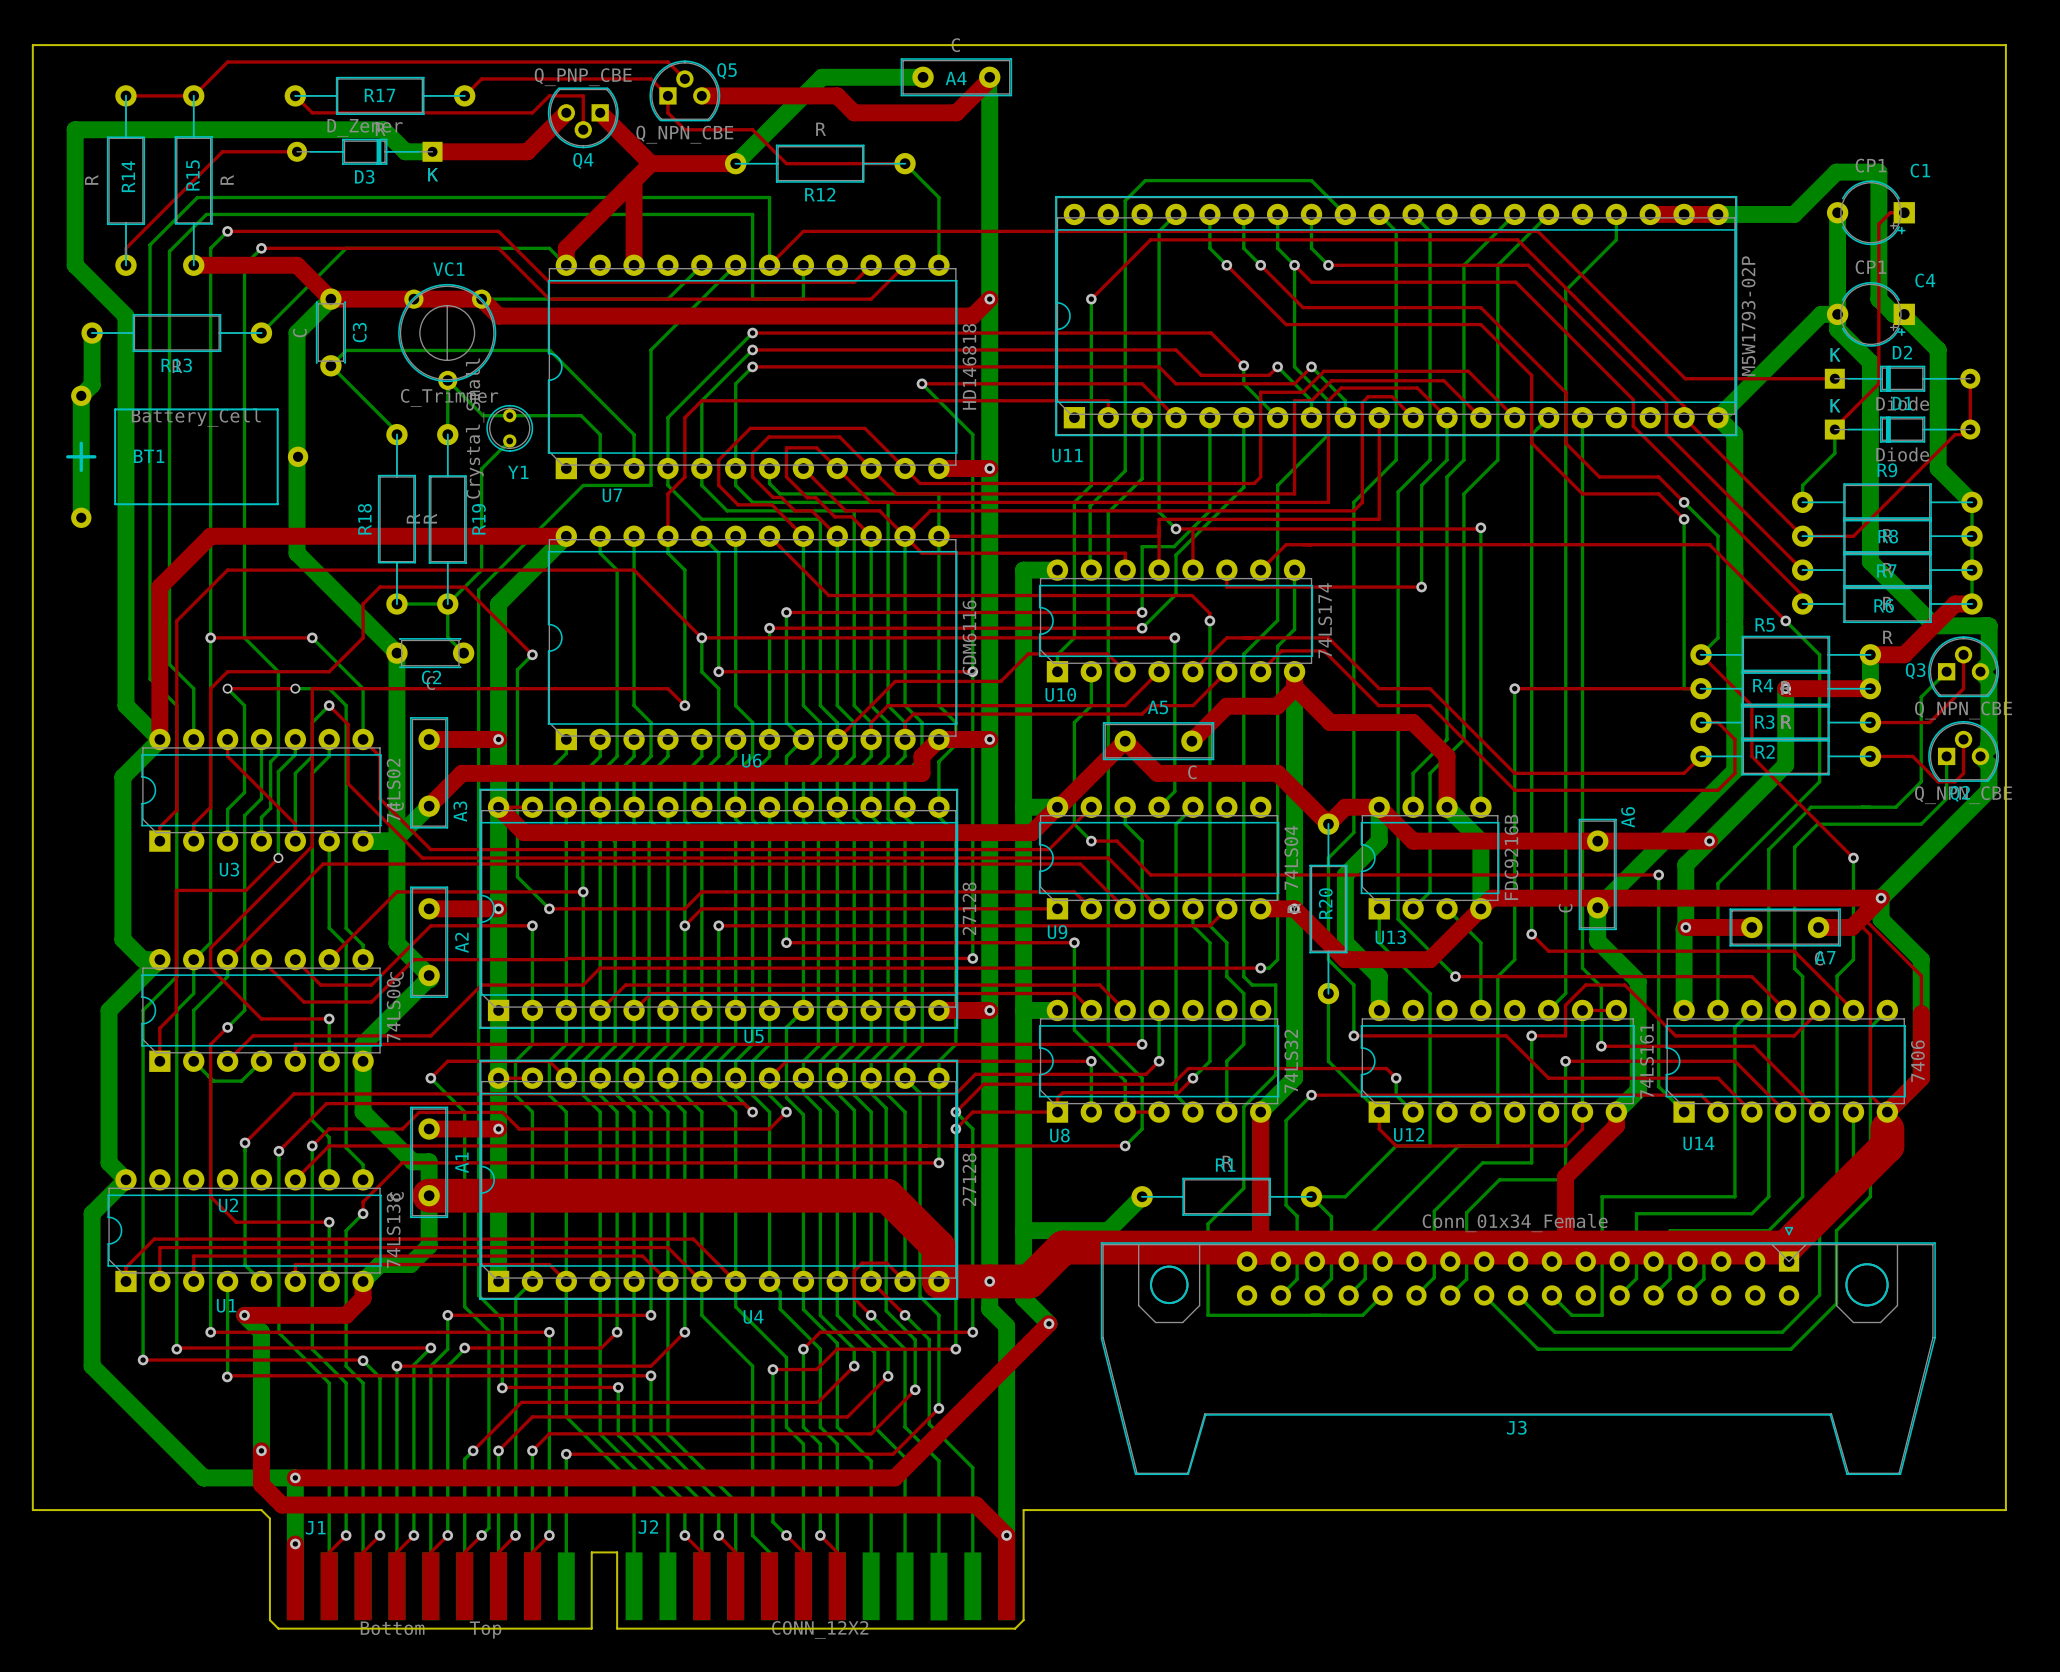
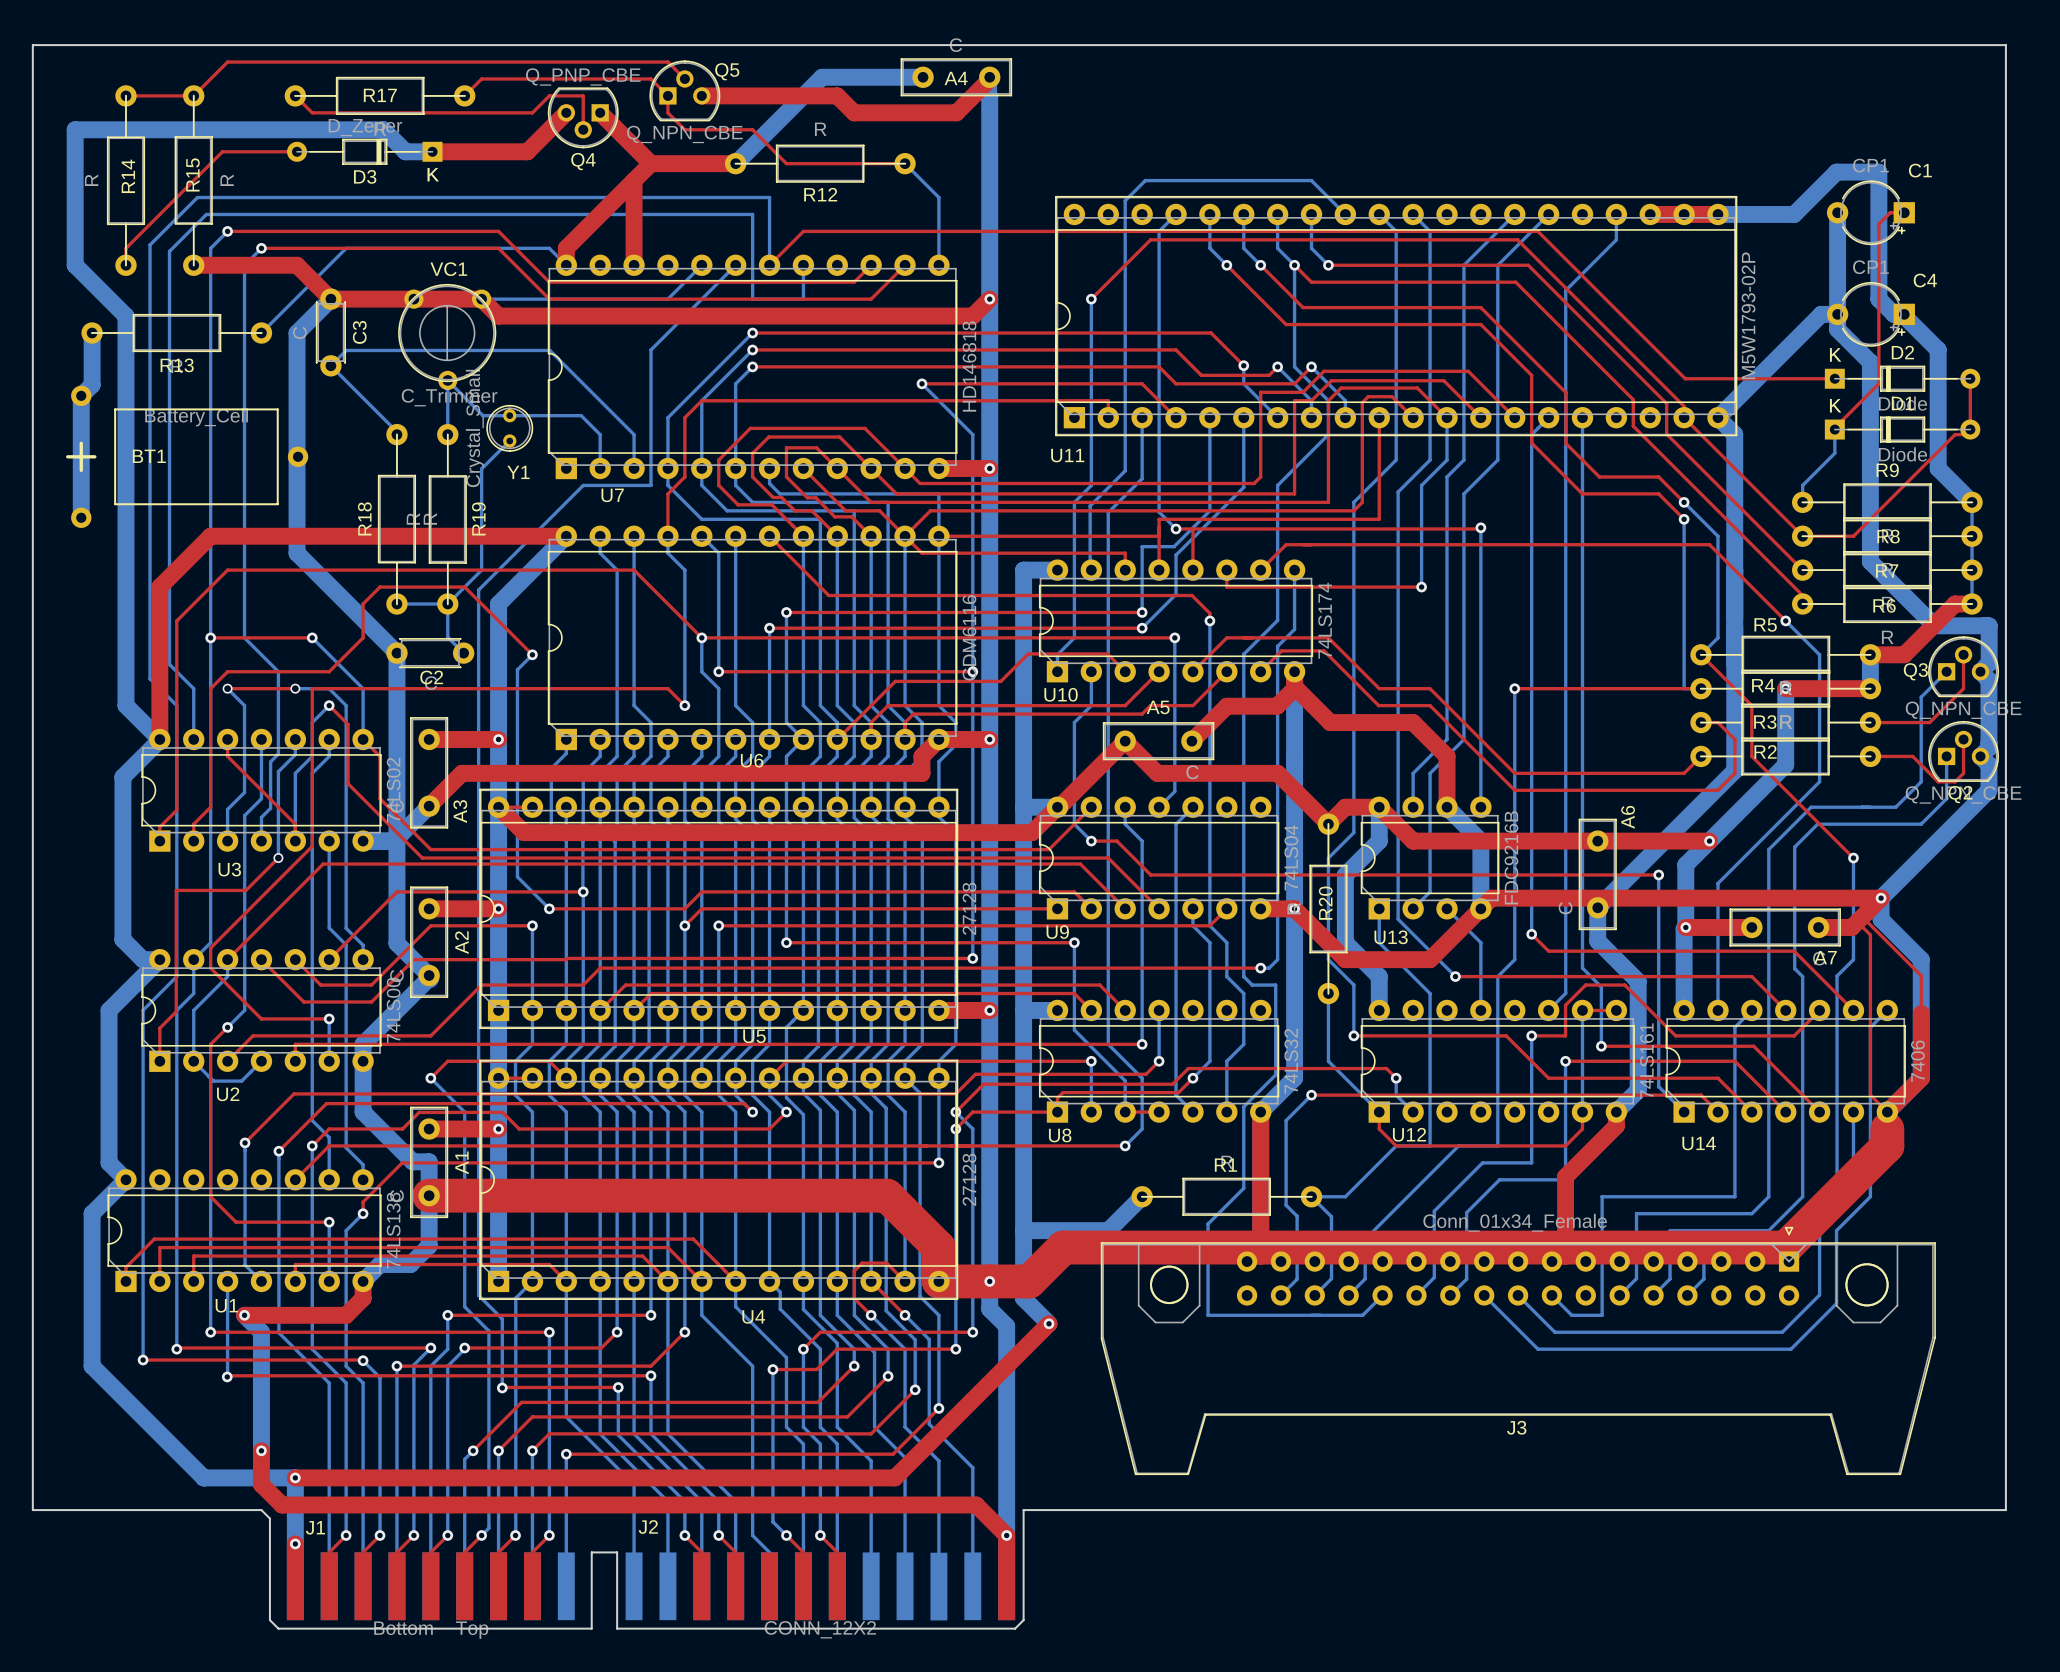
U2 name position: U2 (228, 1205) -> U2 (228, 1094)

